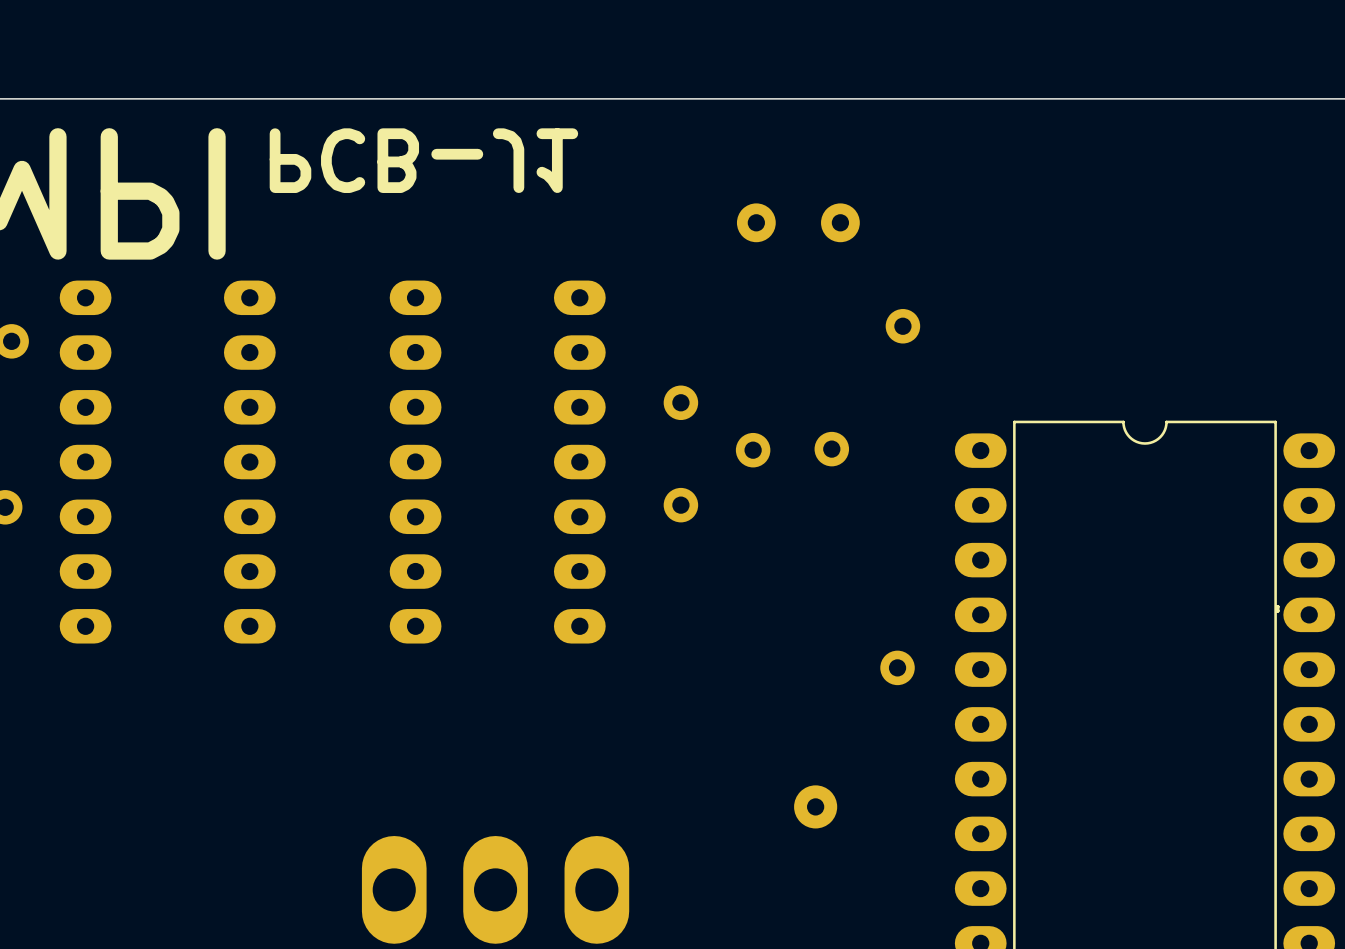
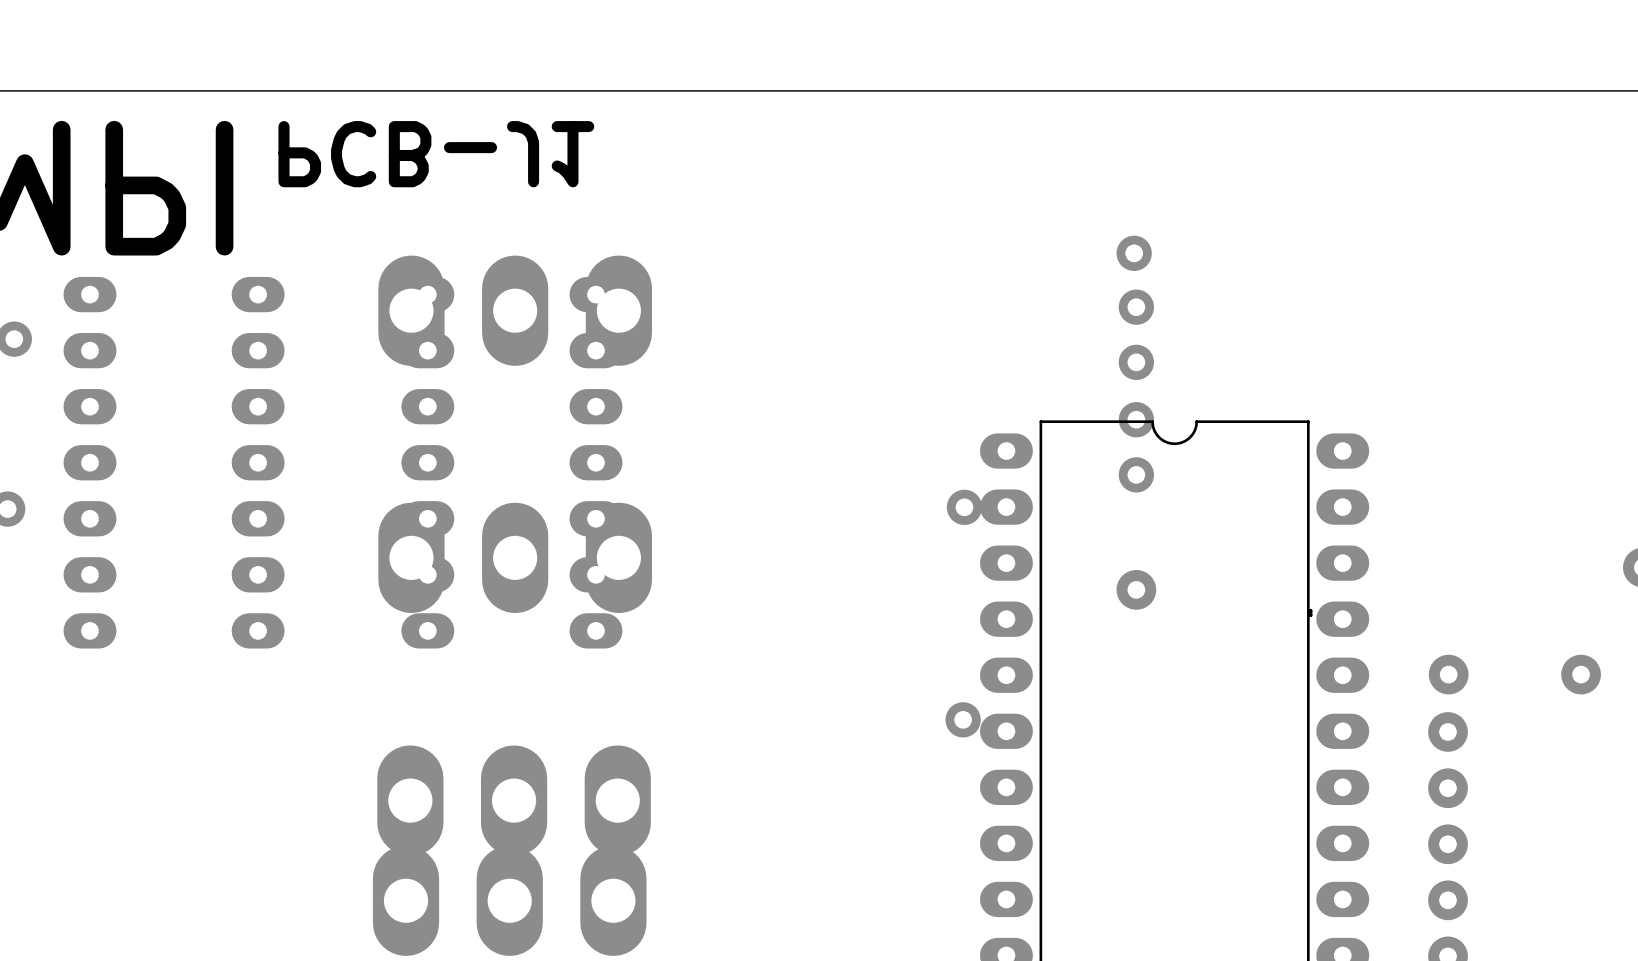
part: (756, 222) -> none
part: (840, 222) -> none
part: none -> (1134, 253)
part: none -> (1136, 307)
part: none -> (515, 310)
part: (902, 326) -> none
part: none -> (1136, 362)
part: (680, 402) -> none
part: none -> (1136, 419)
part: (831, 449) -> none
part: (753, 450) -> none
part: none -> (1136, 474)
part: (680, 505) -> none
part: none -> (964, 507)
part: none -> (515, 557)
part: none -> (1136, 589)
part position: (897, 667) -> (963, 719)
part: none -> (514, 800)
part: (815, 806) -> none

